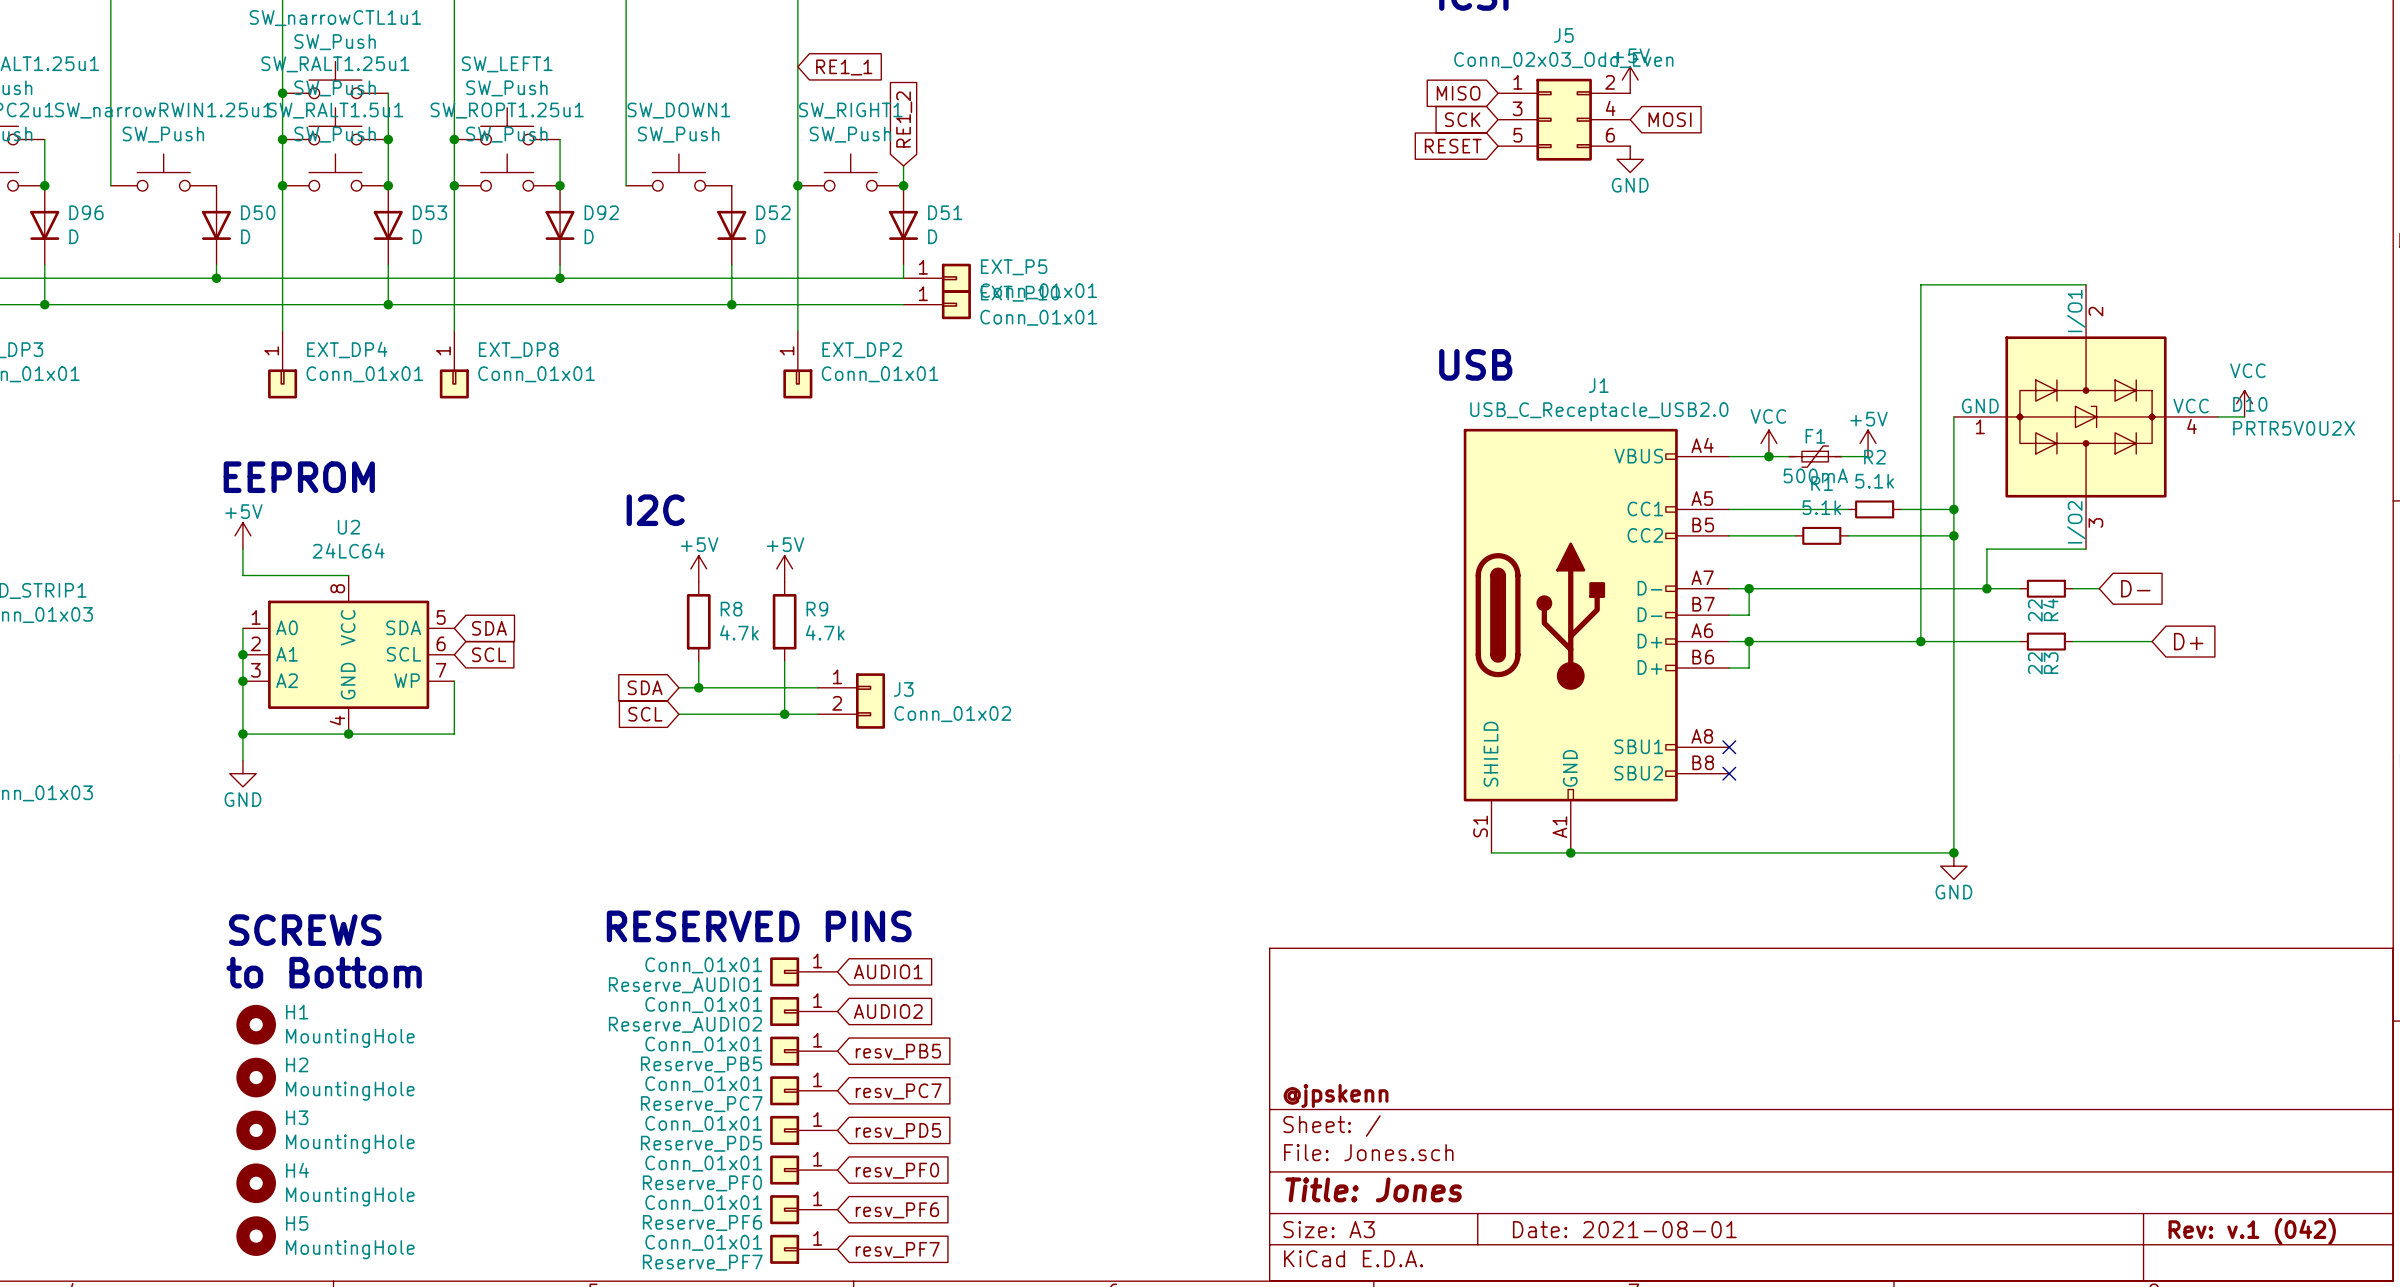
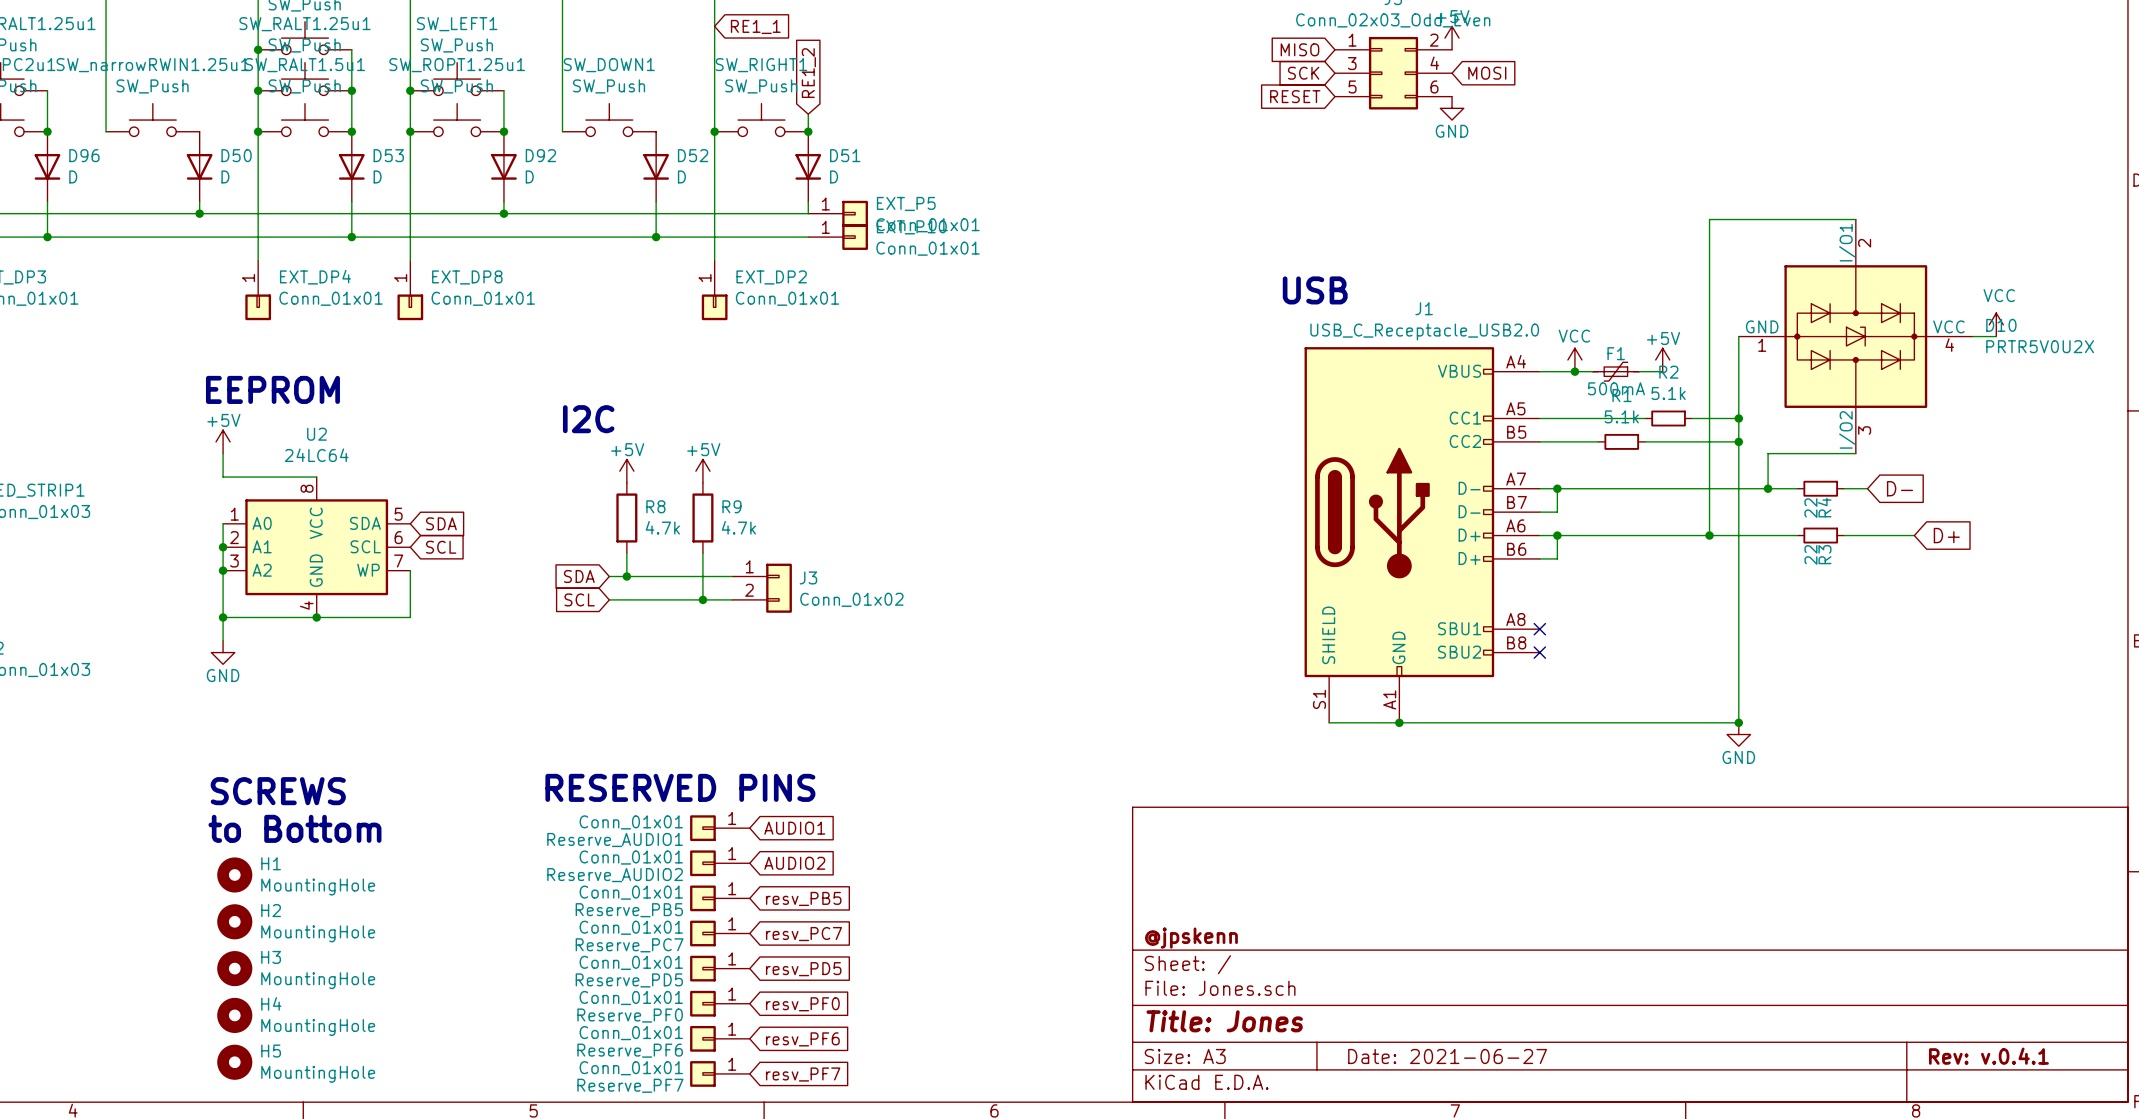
title block: Date: 2021-08-01 (1624, 1229) -> Date: 2021-06-27 (1447, 1056)
title block: Rev: v.1 (042) (2252, 1231) -> Rev: v.0.4.1 (1988, 1056)

